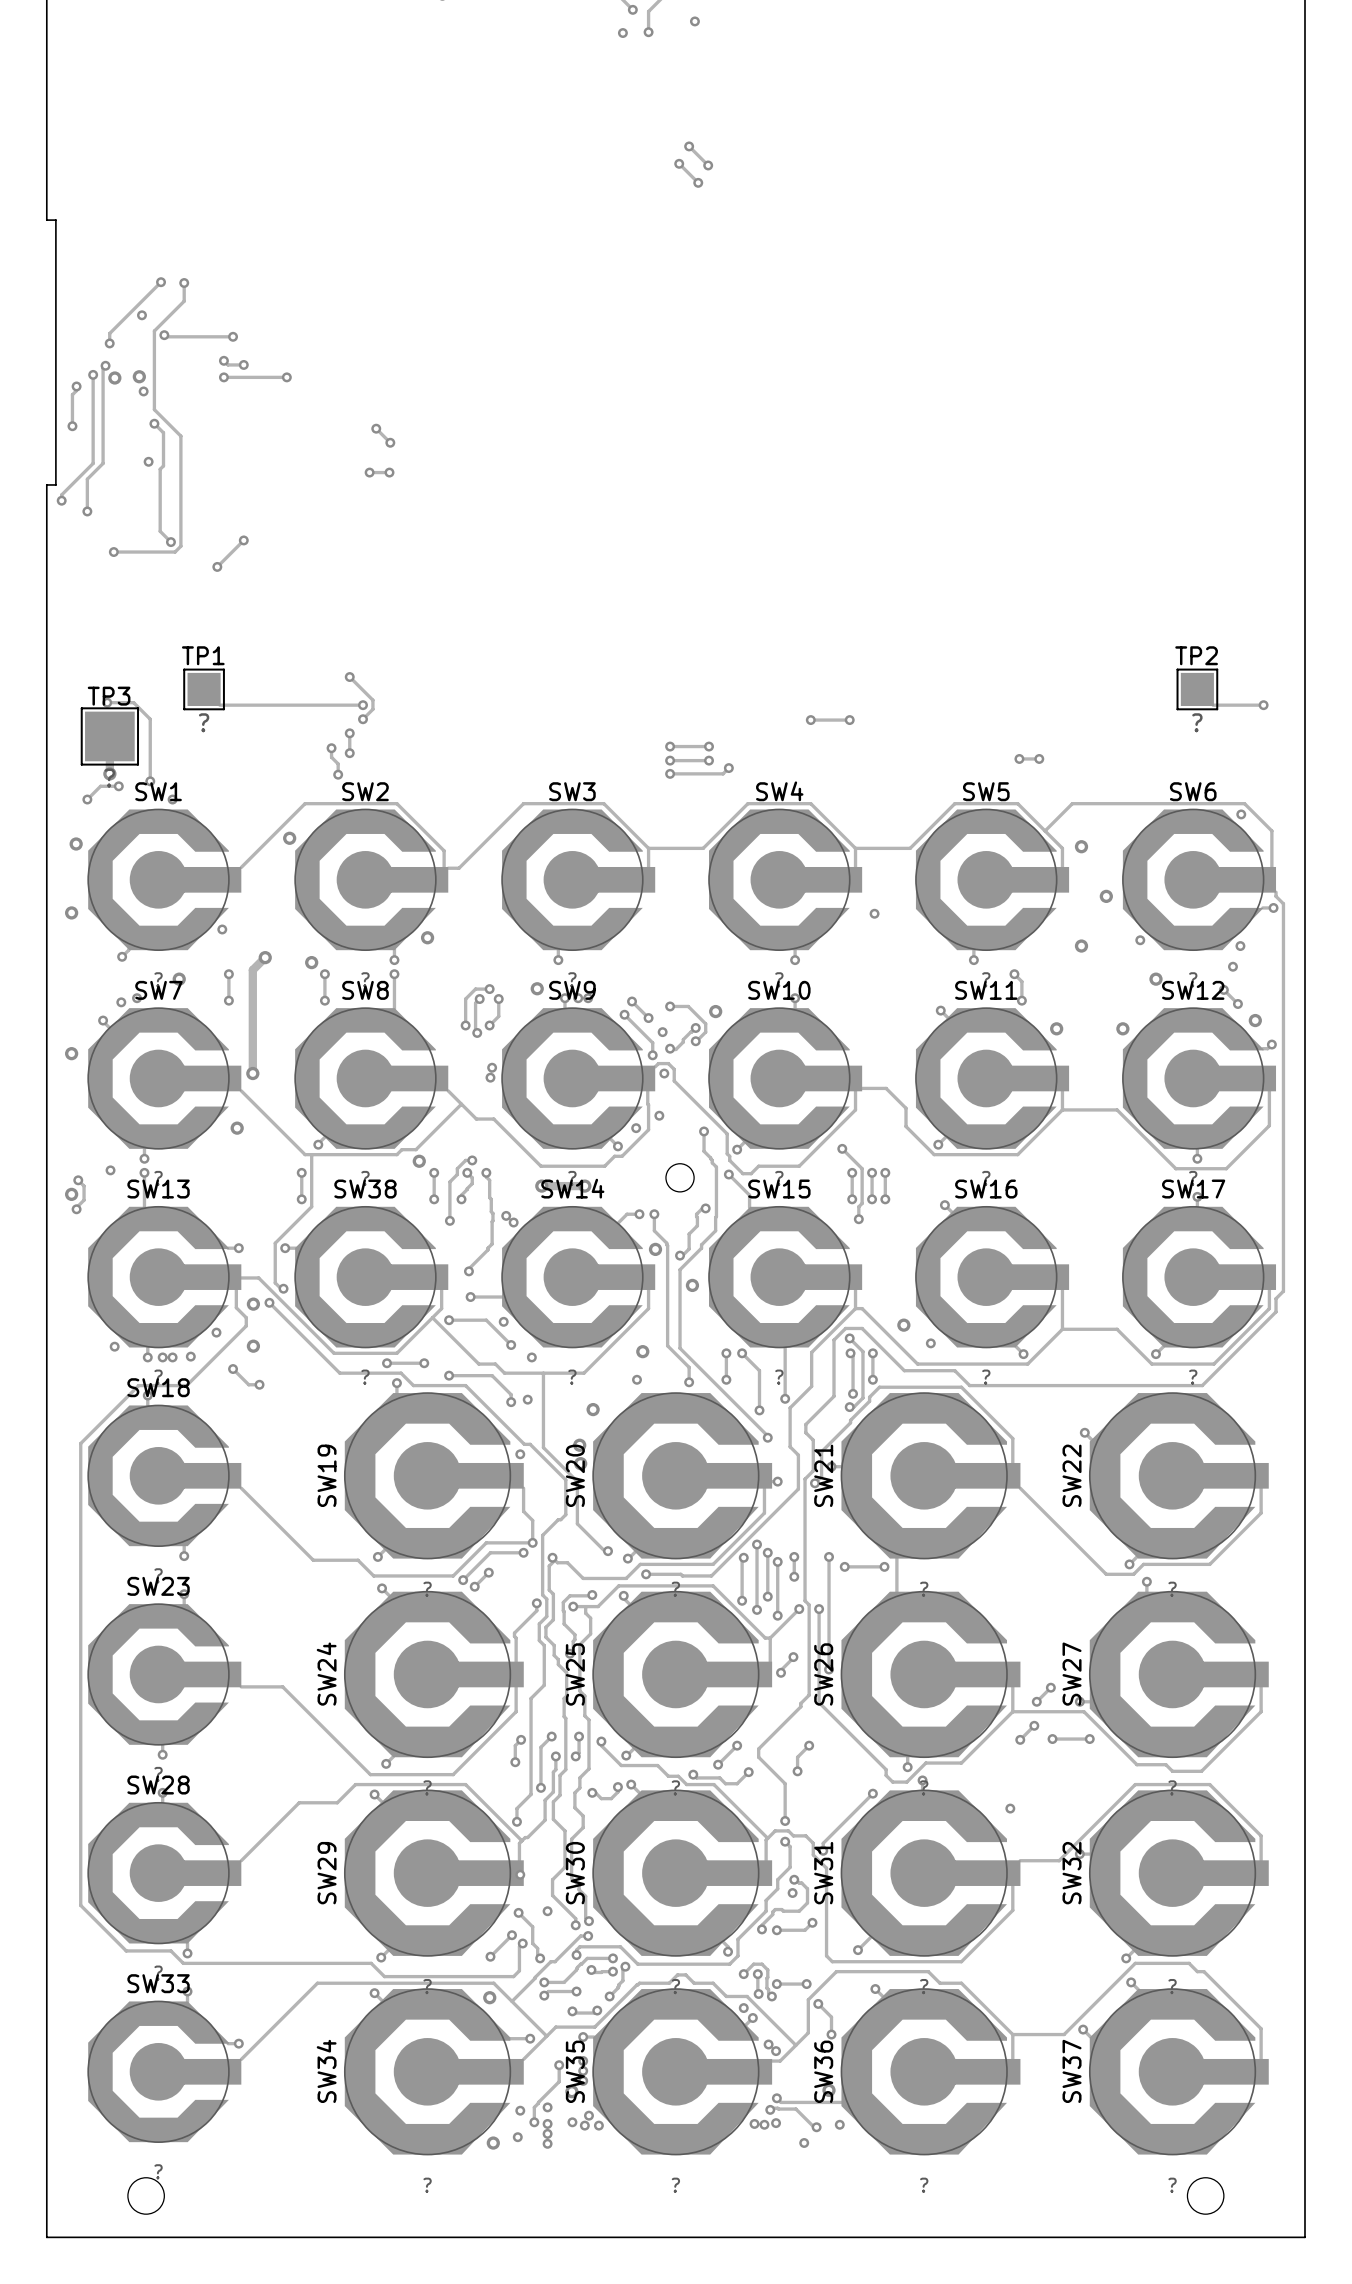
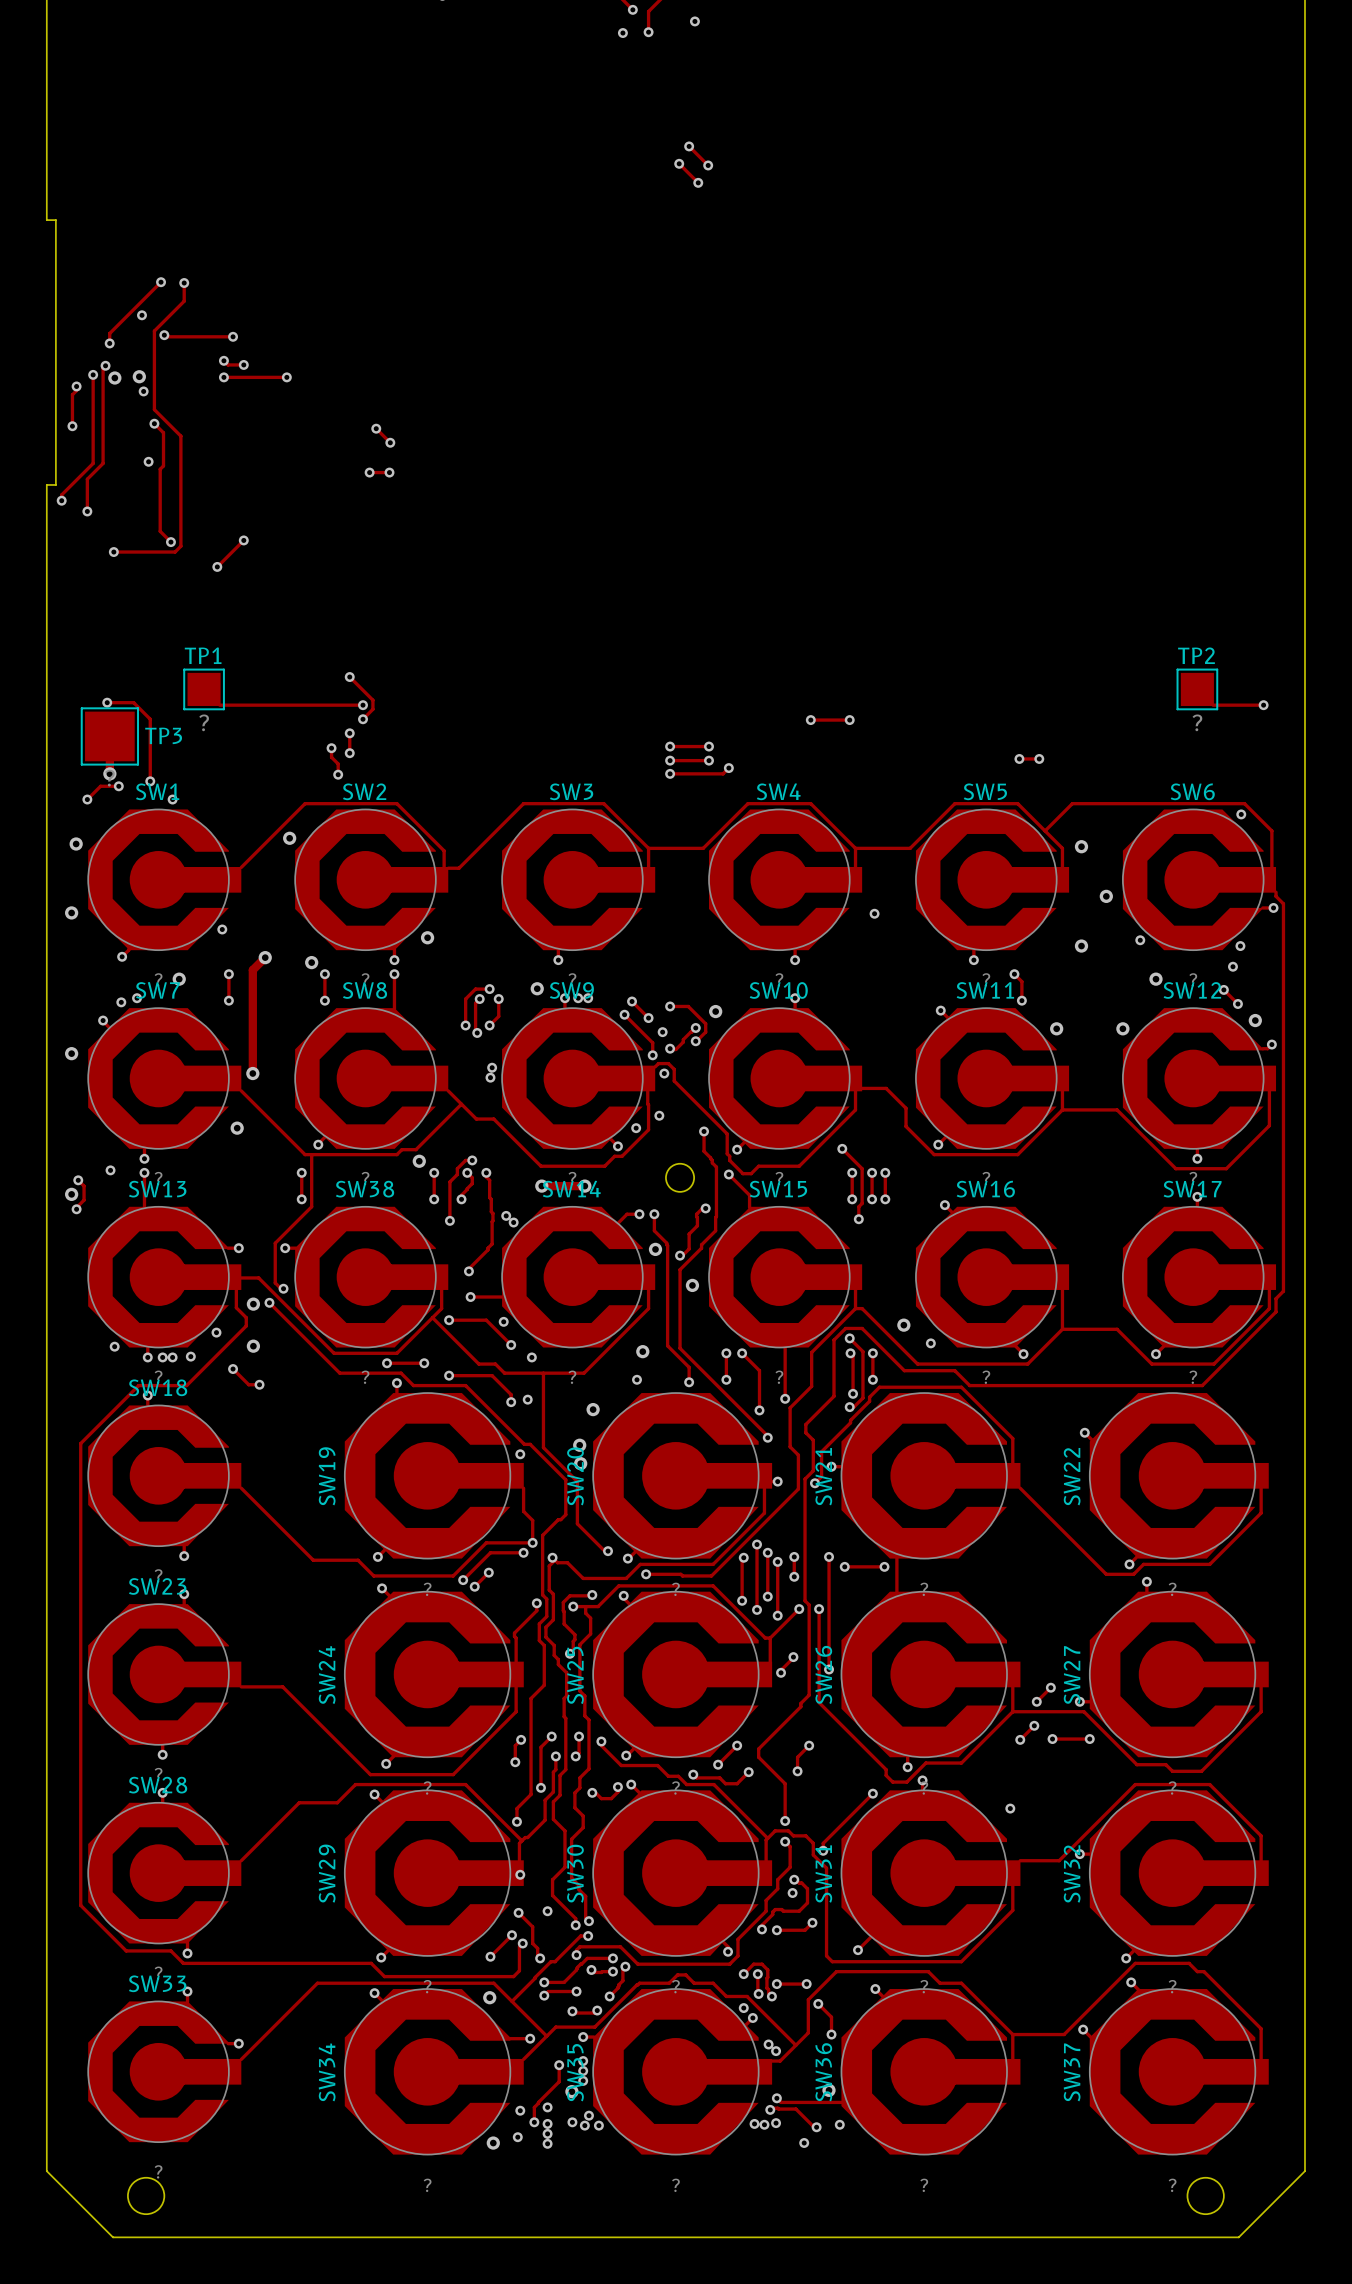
TP3 name position: TP3 (109, 696) -> TP3 (163, 735)
board edge: (46, 2171) (46, 2237) (113, 2237) -> (46, 2171) (113, 2237)
board edge: (1304, 2171) (1304, 2237) (1238, 2237) -> (1304, 2171) (1238, 2237)

